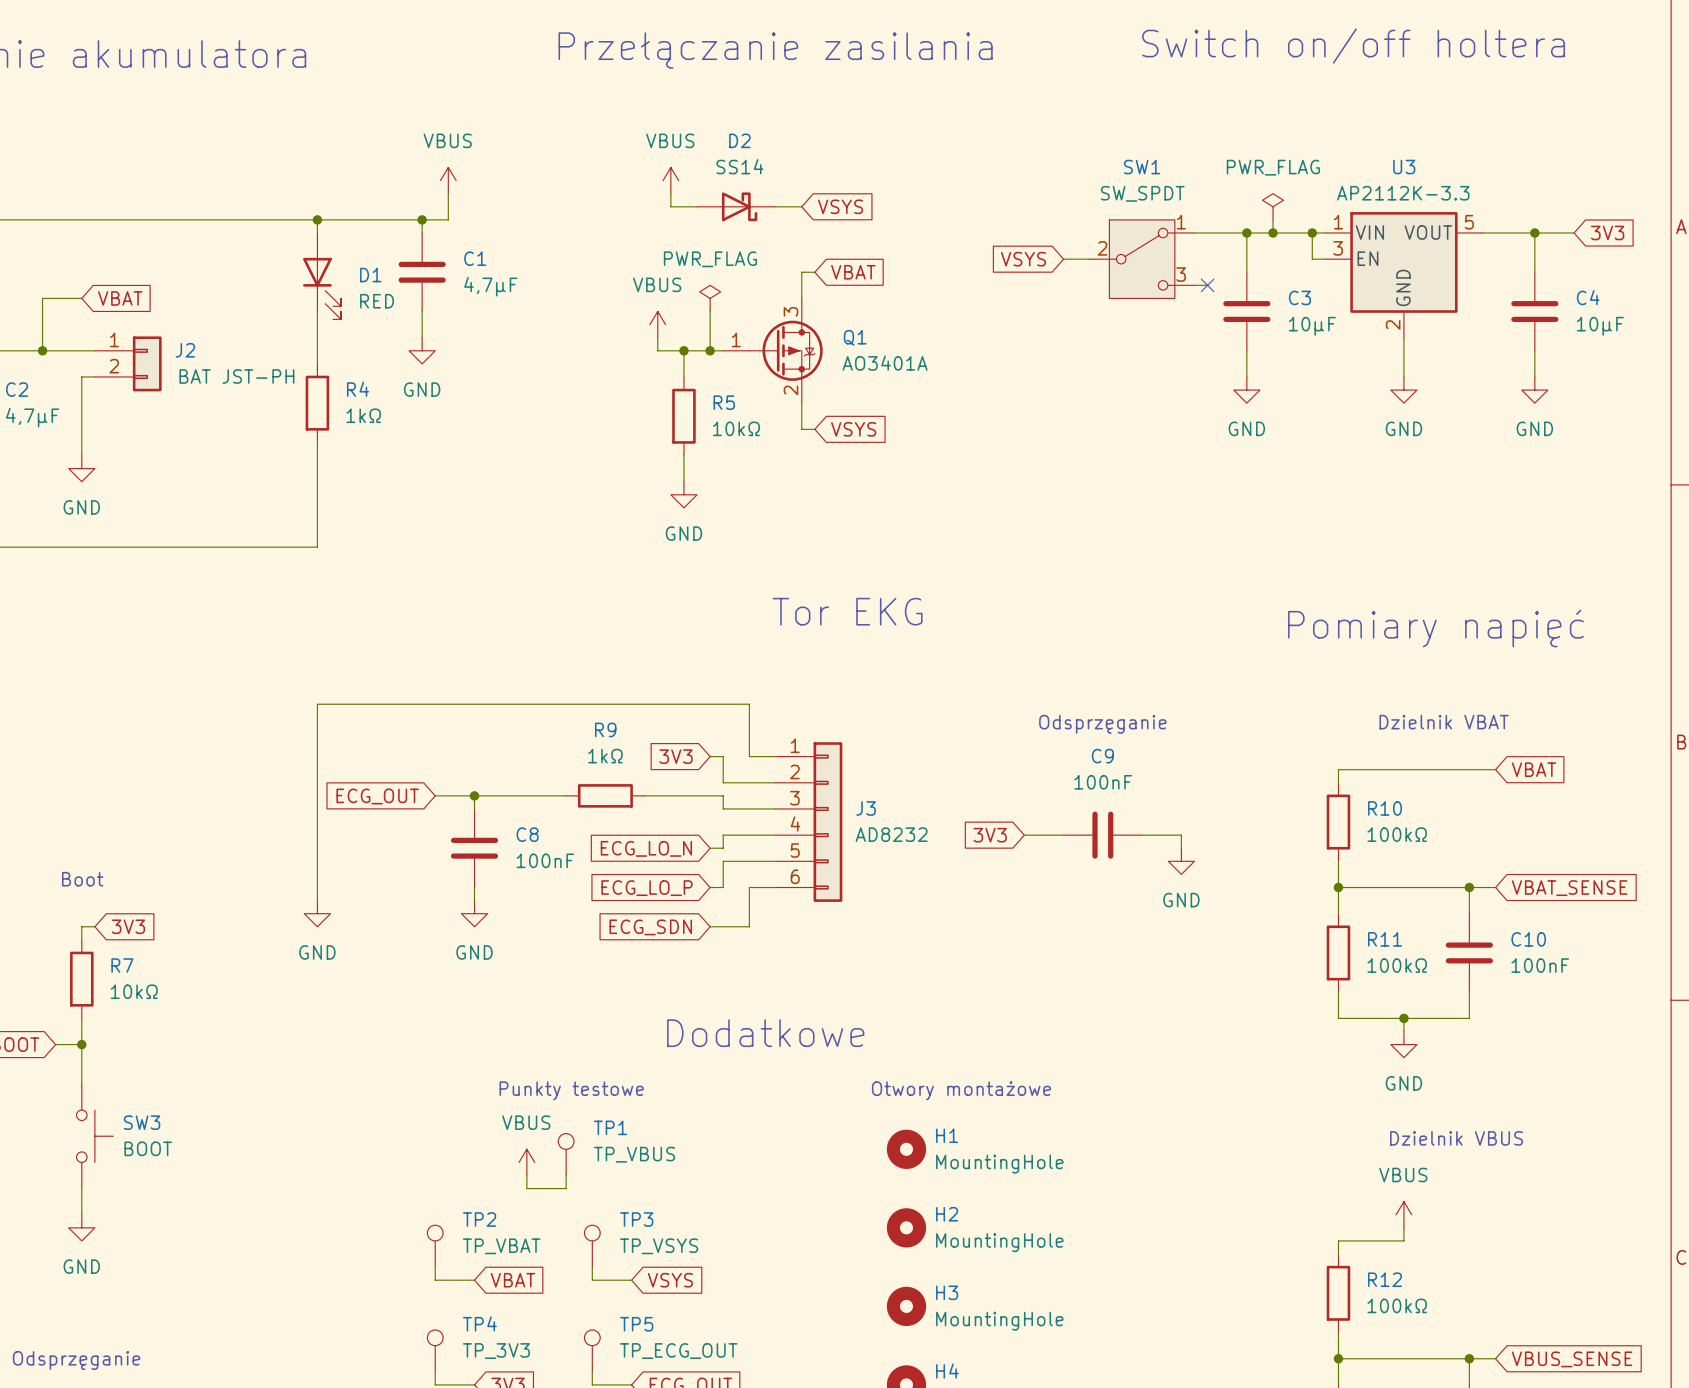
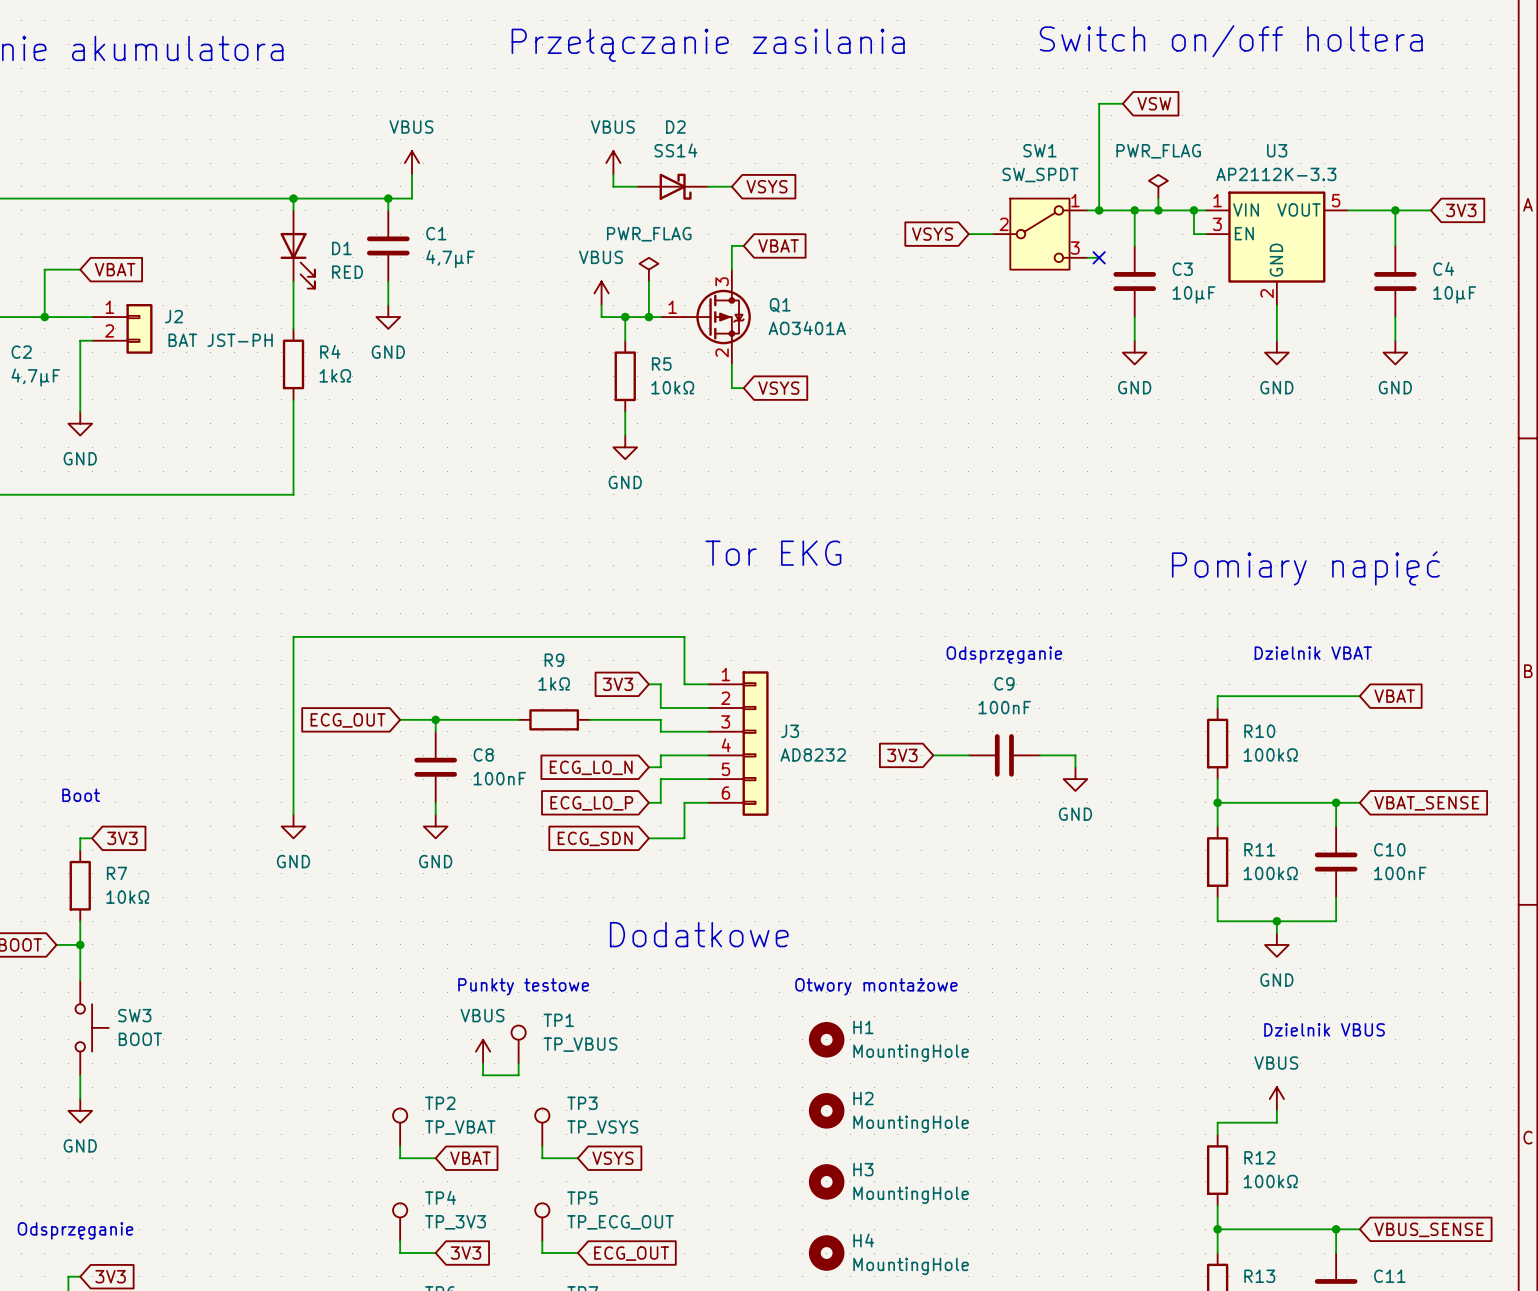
wire: none -> (1122, 103) (1099, 103) (1099, 210)
global label: none -> VSW (1154, 103)
junction: none -> (1099, 210)

